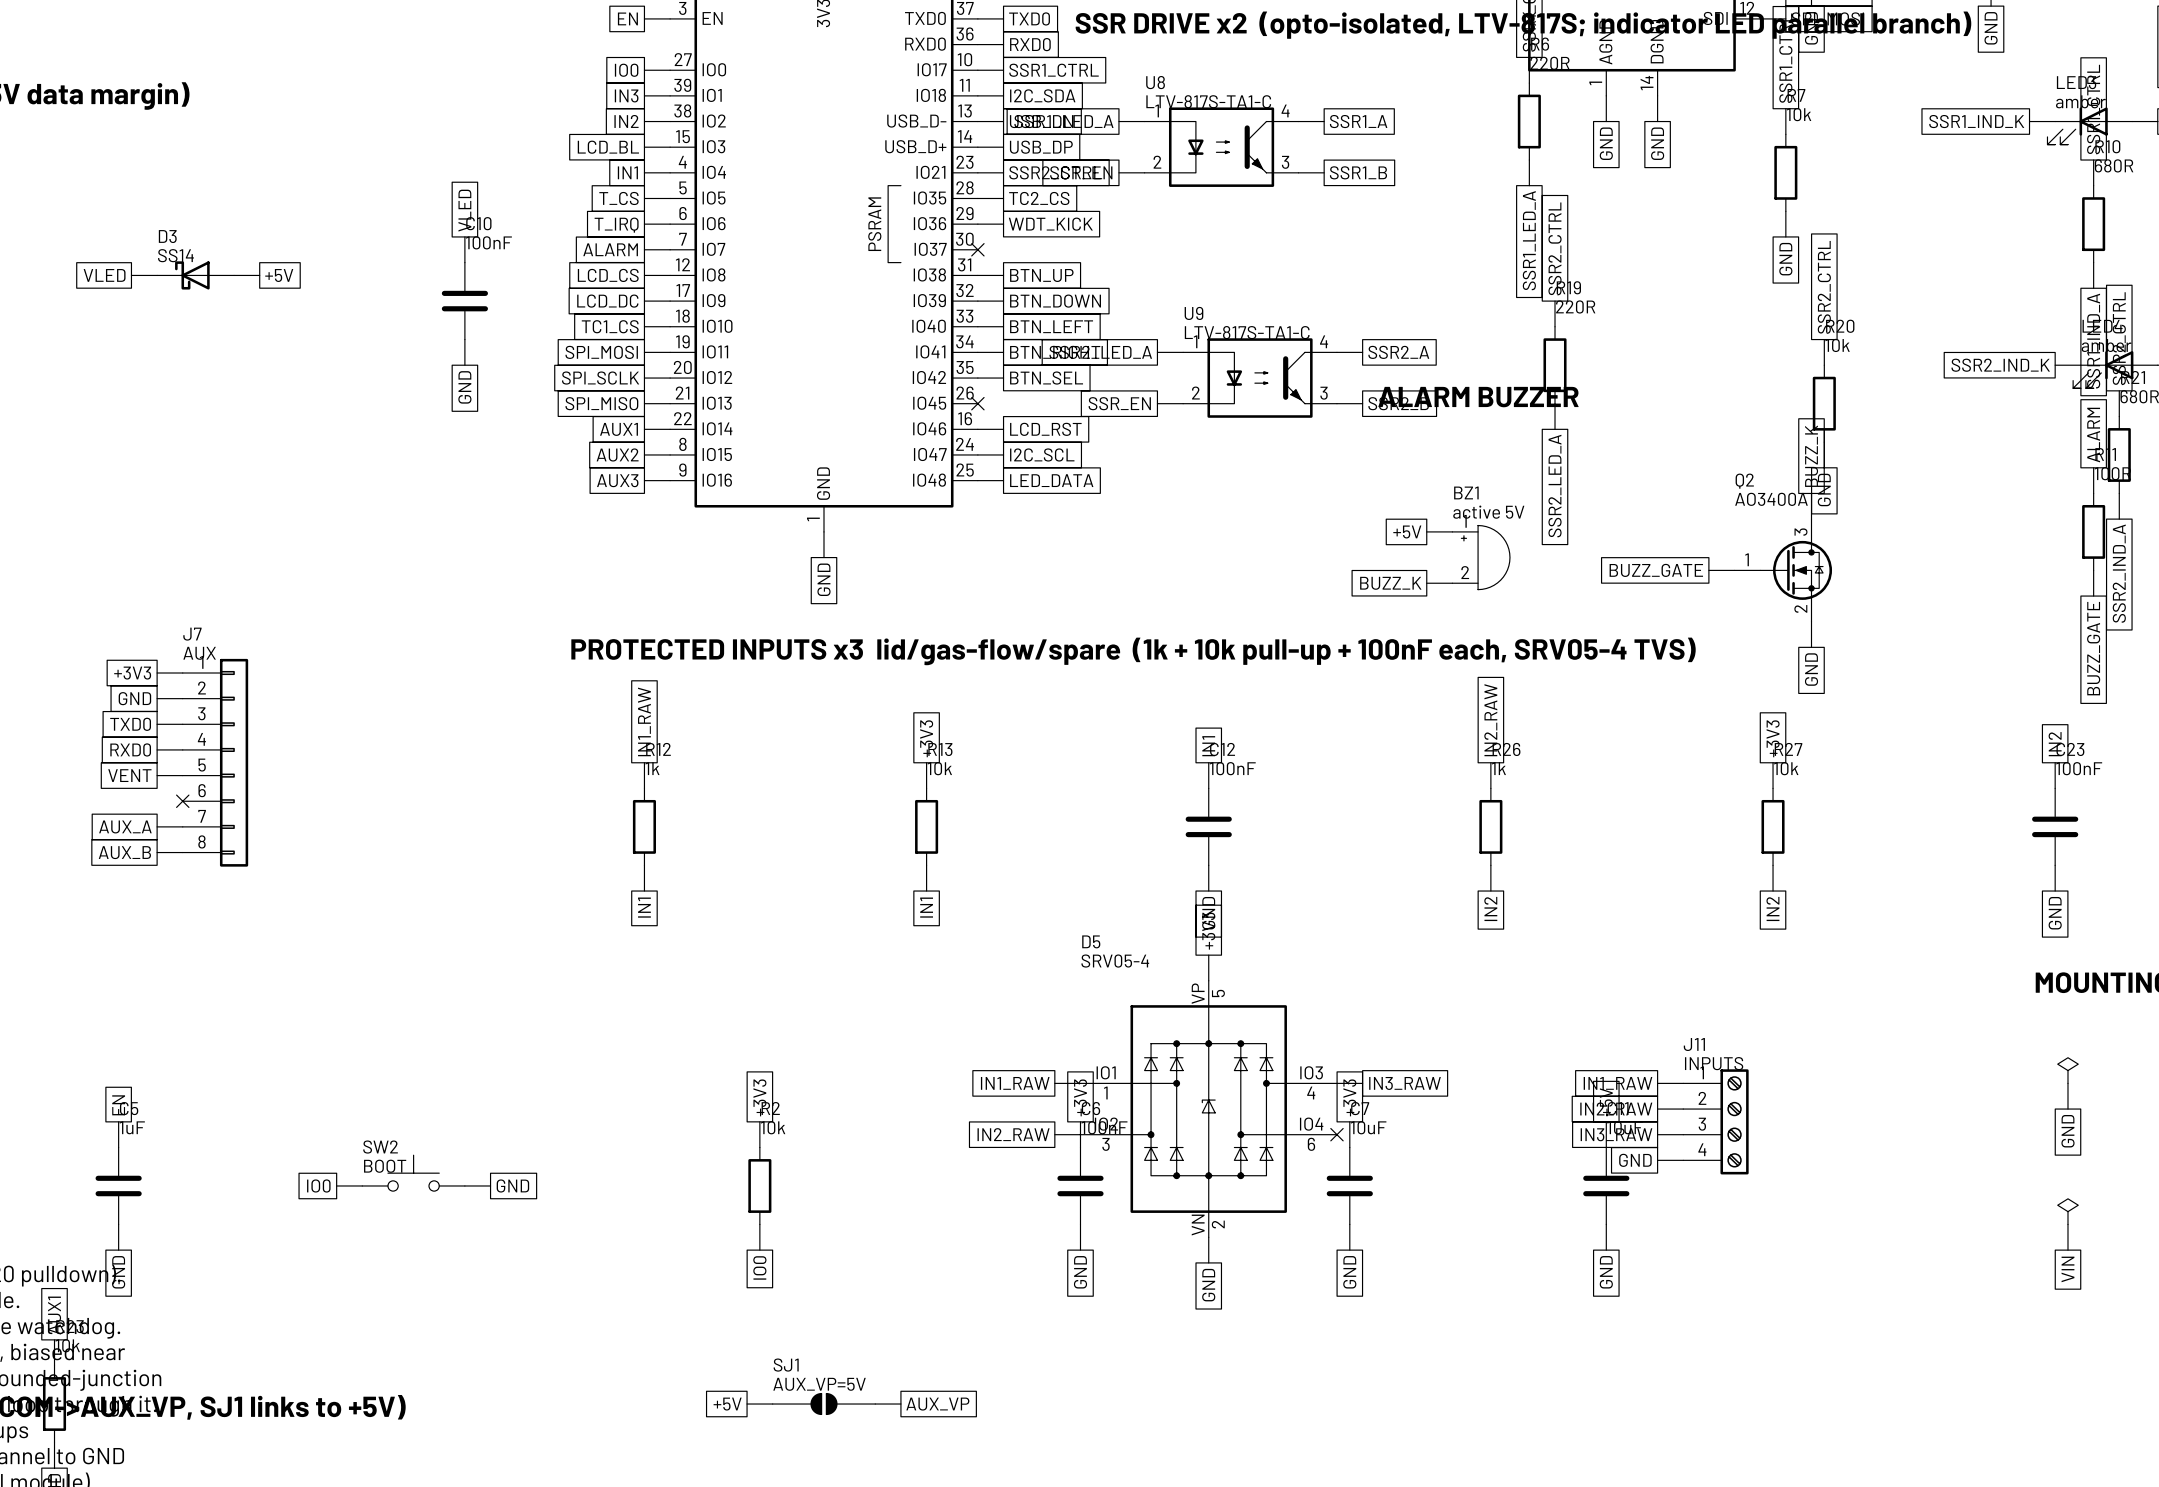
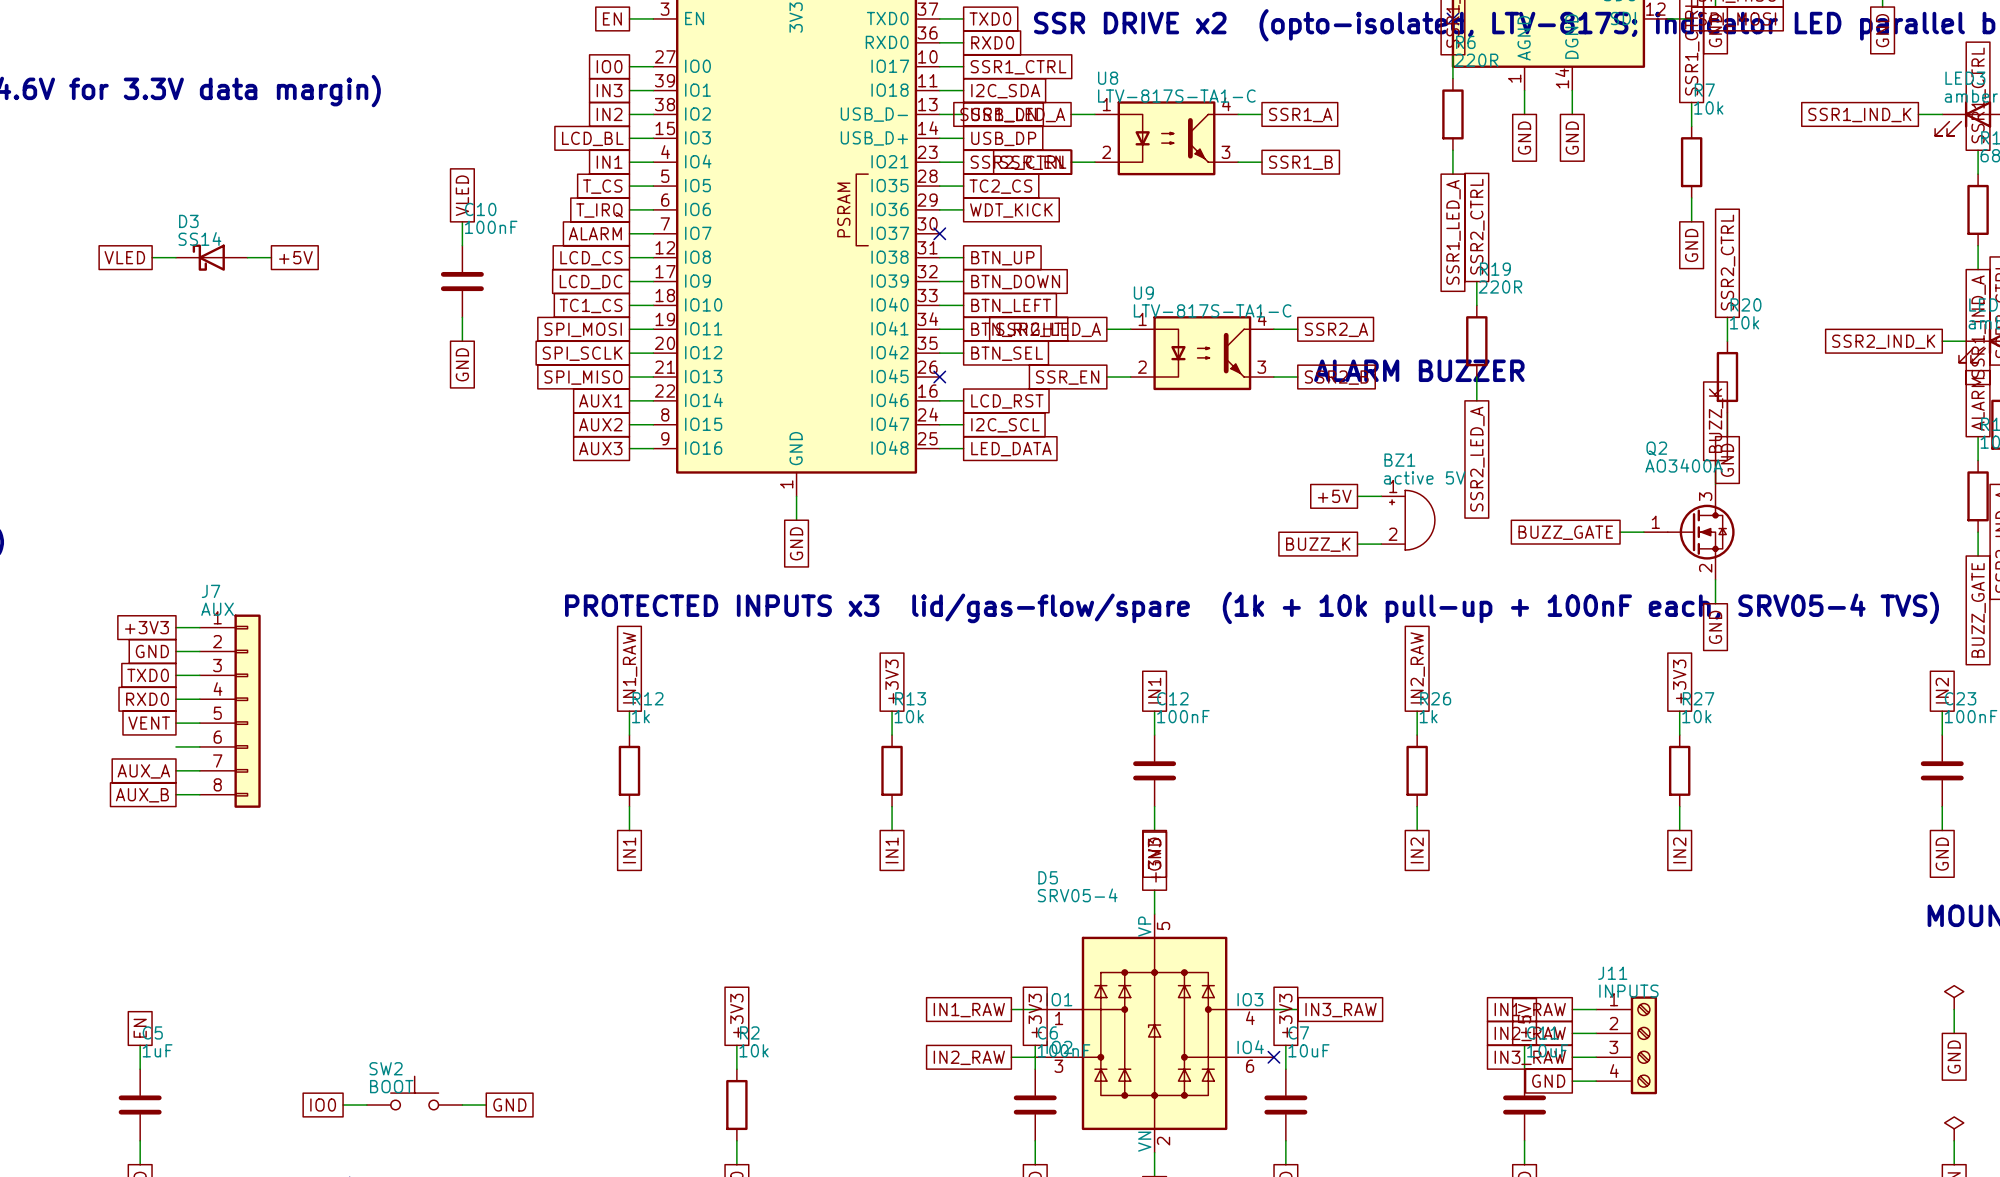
wire: none -> (175, 746) (199, 746)
no-connect mark: (182, 801) -> none

